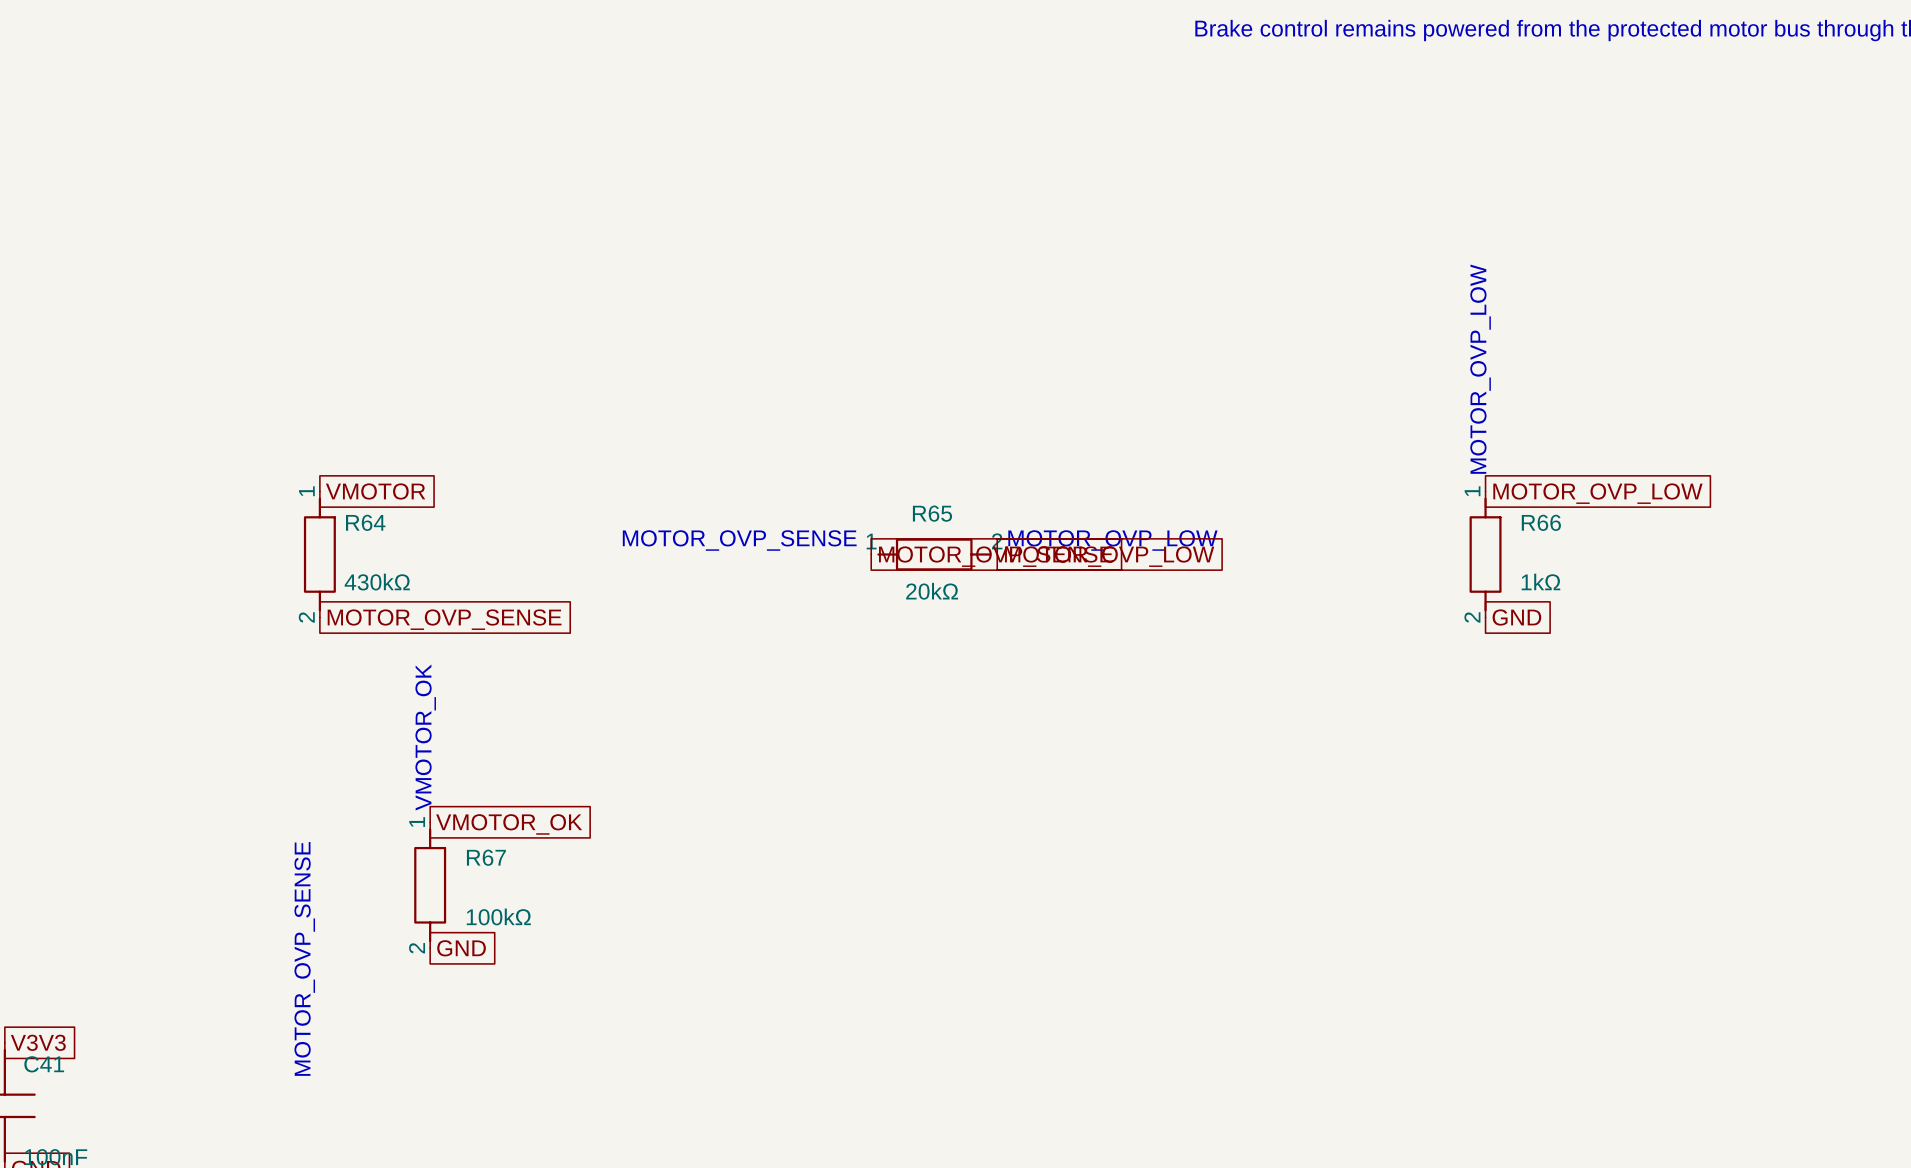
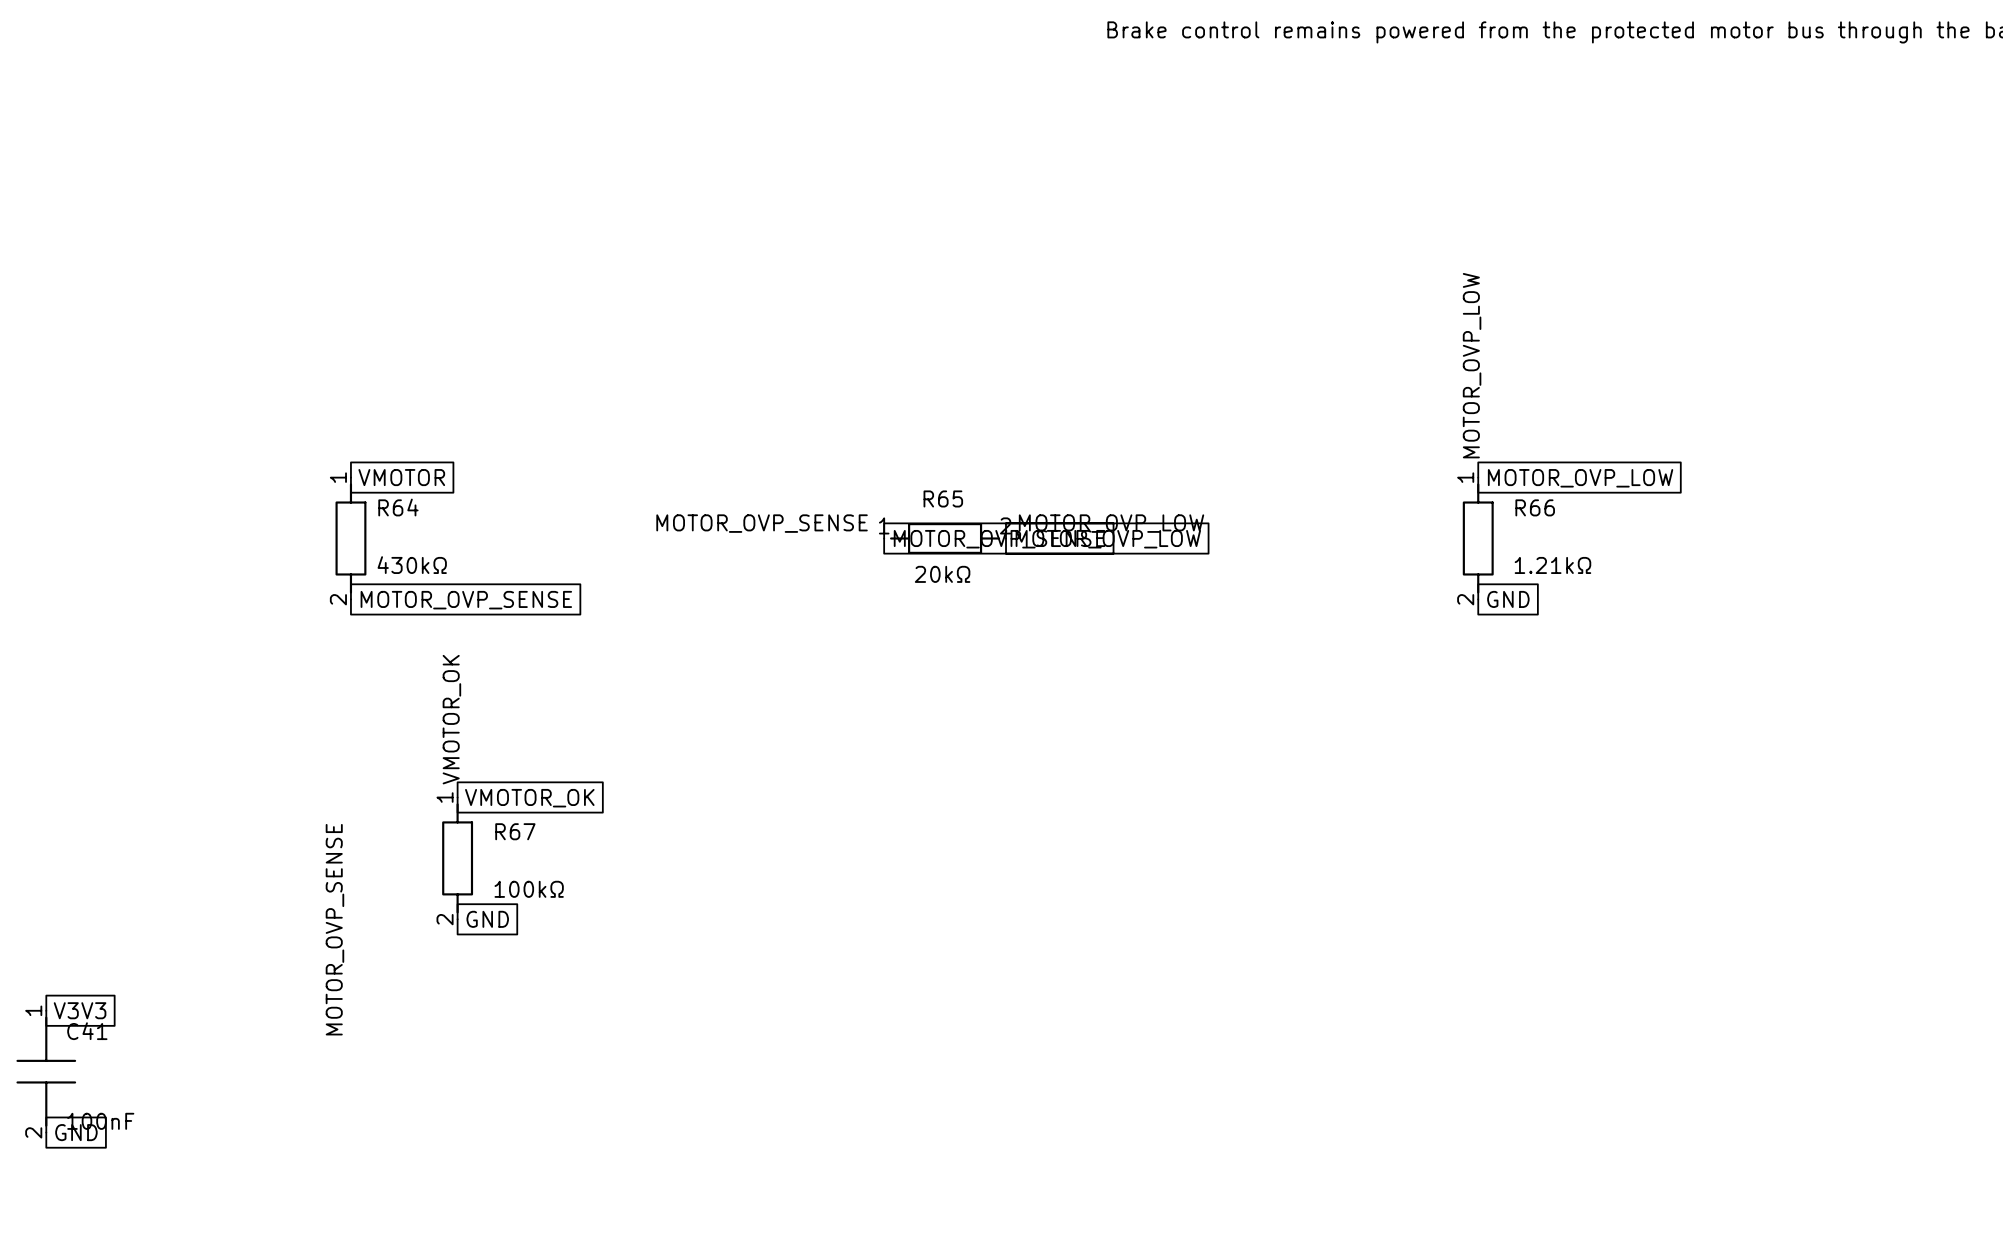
R66 value: 1kΩ (1540, 581) -> 1.21kΩ (1552, 565)

